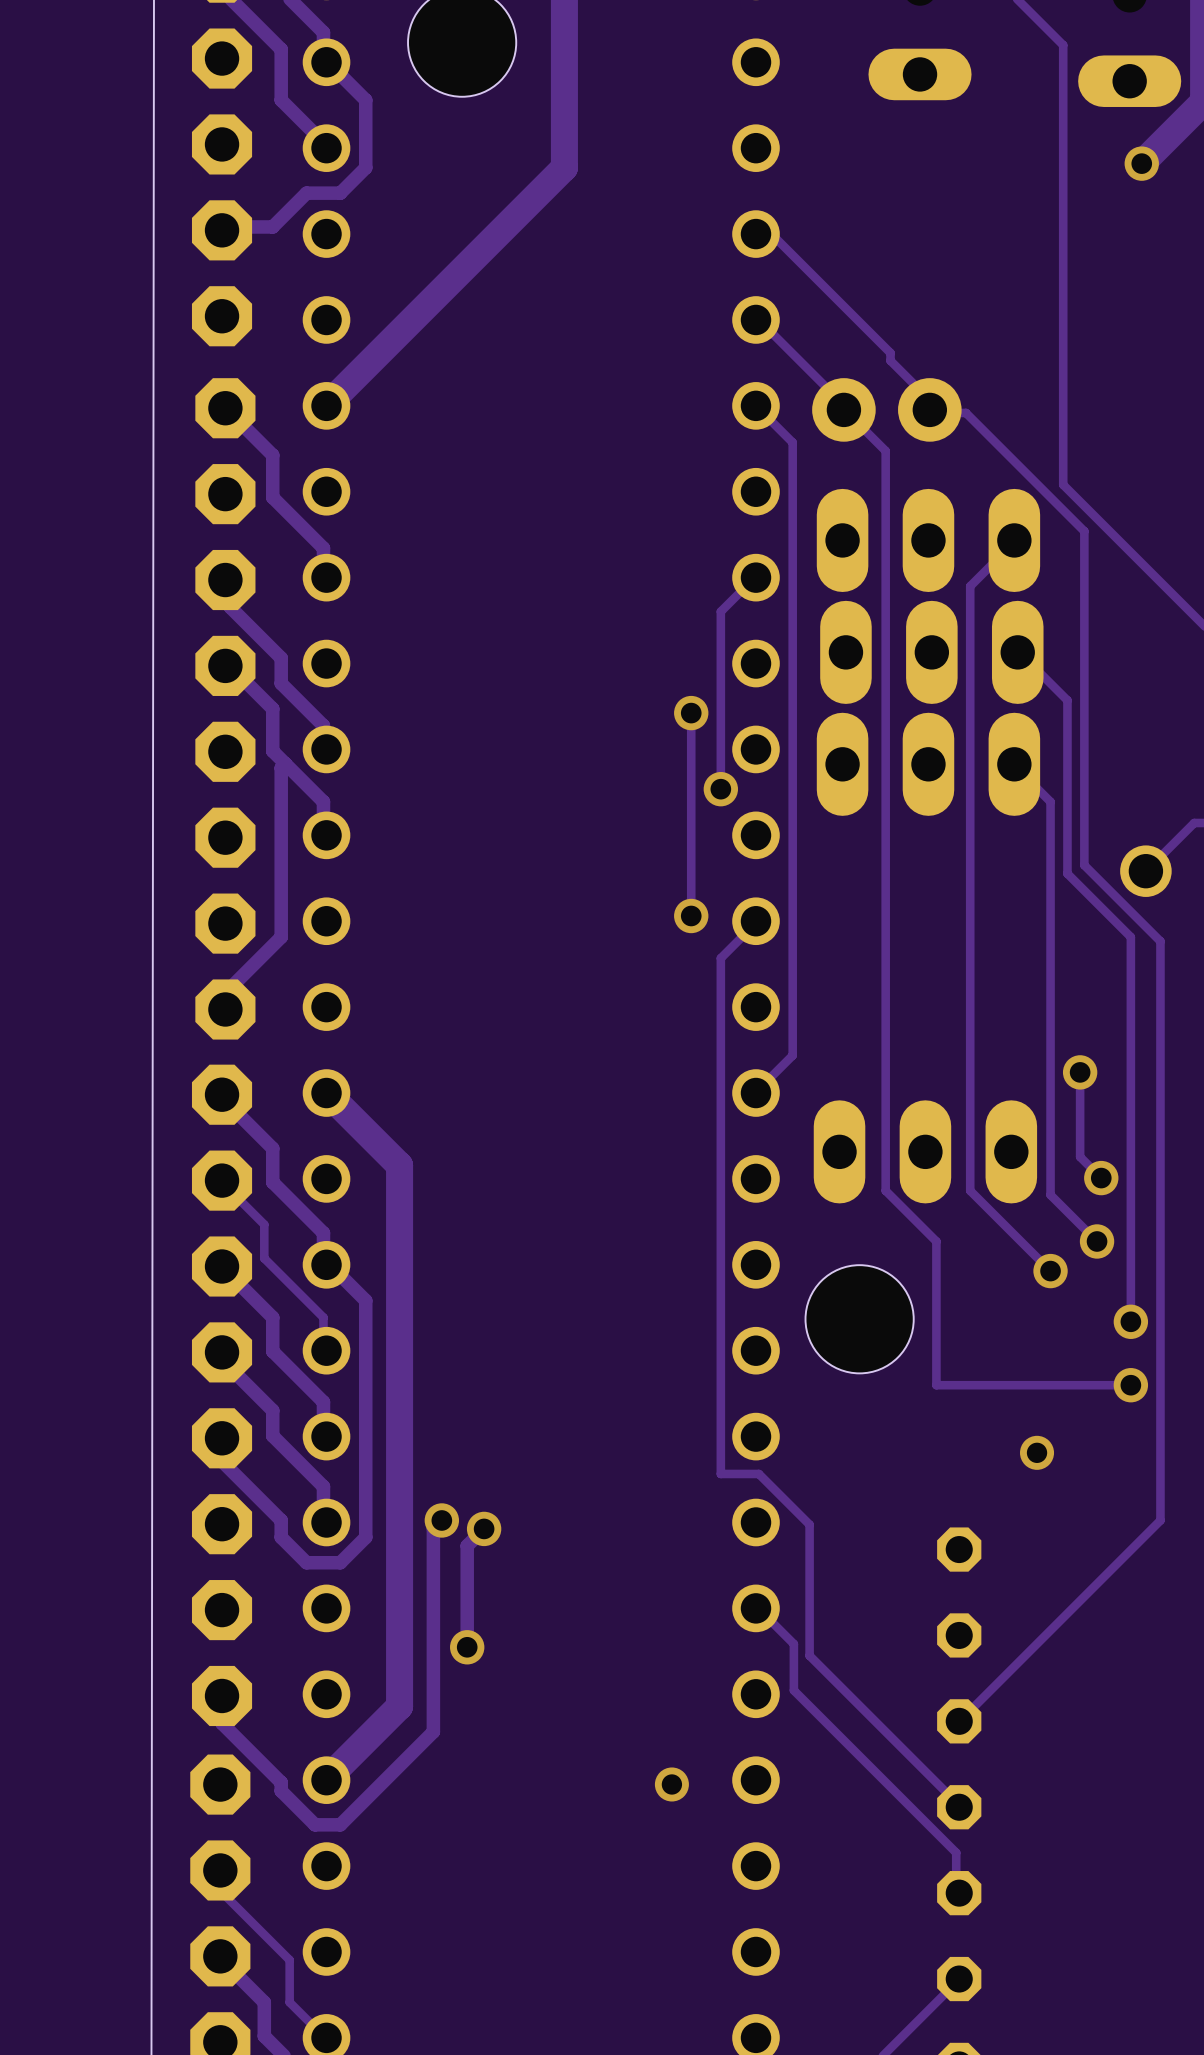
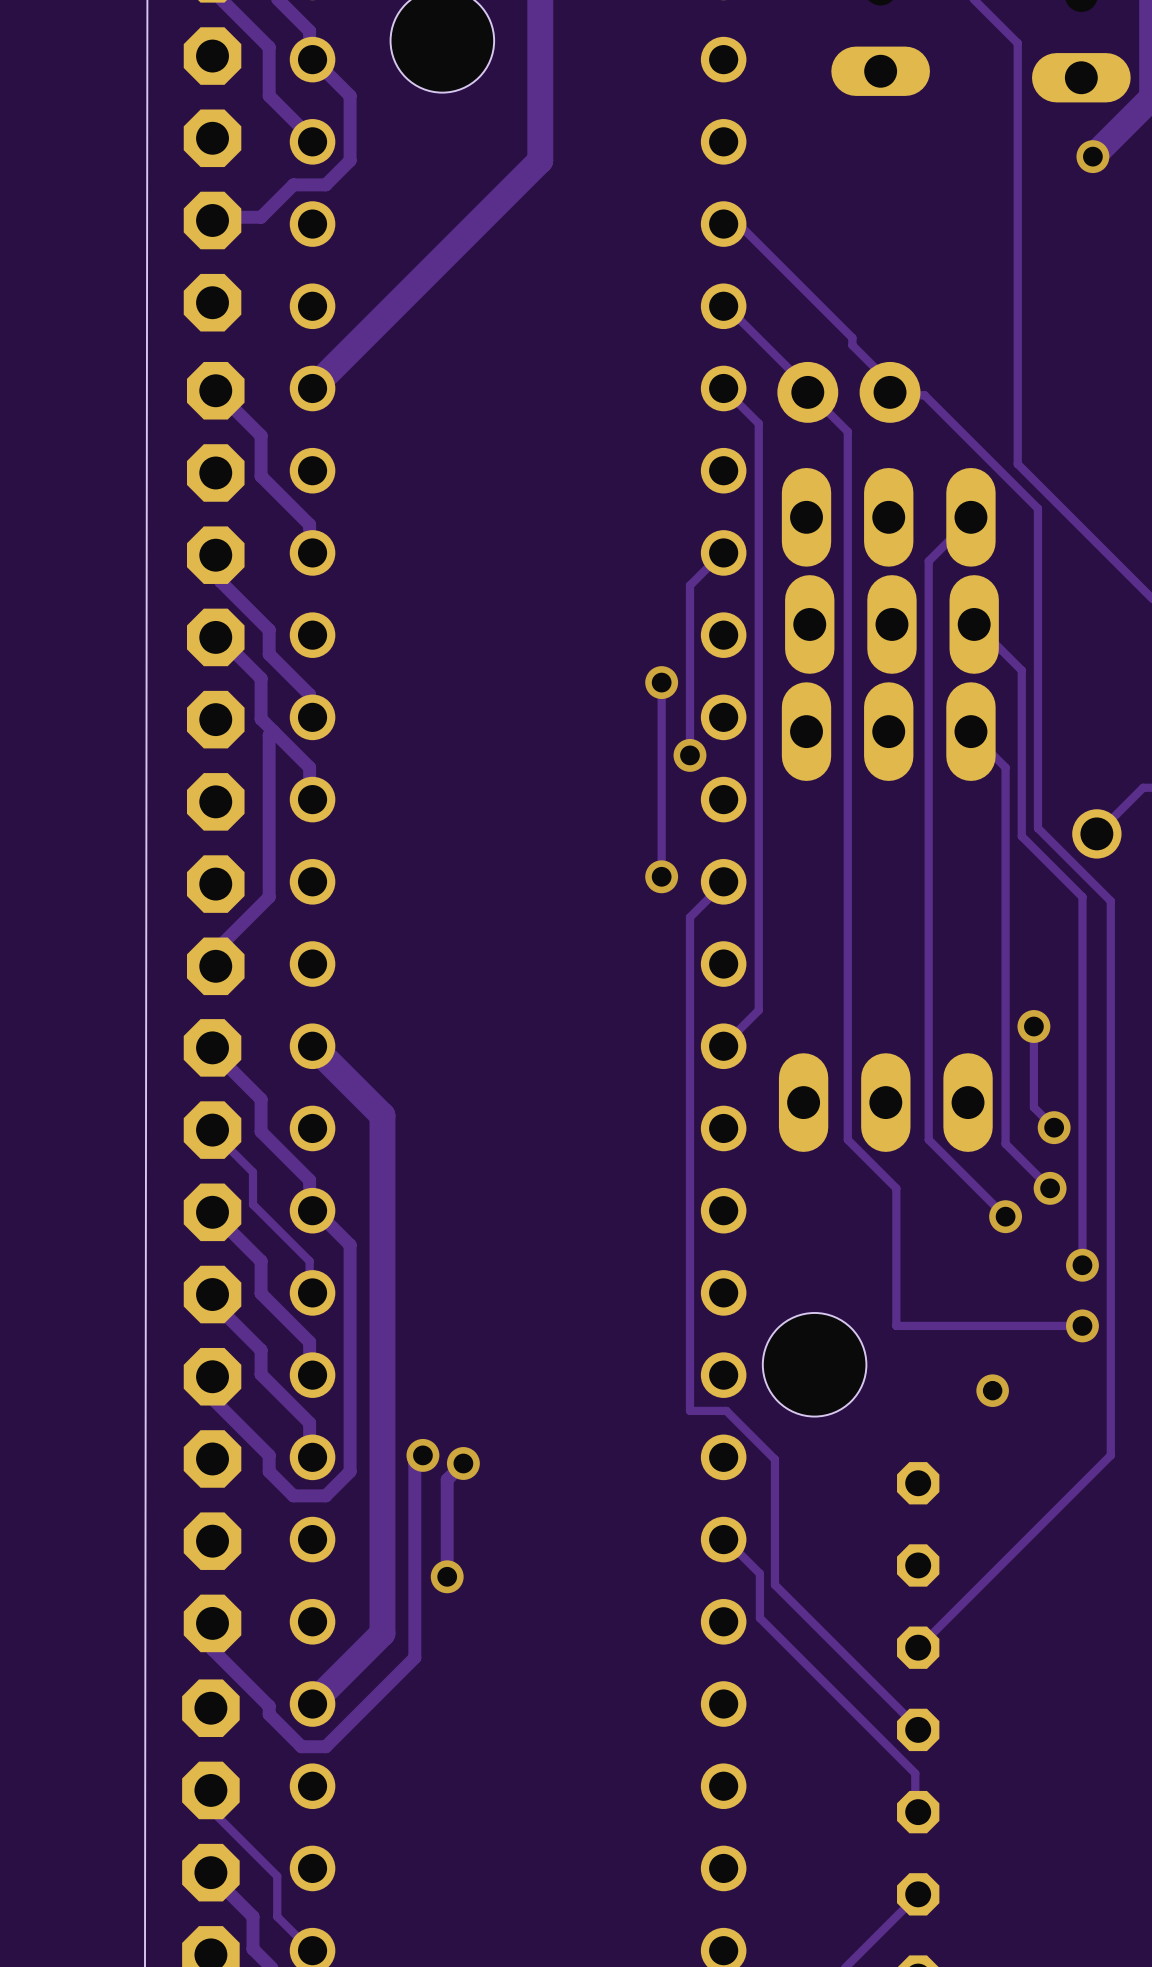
hole position: (859, 1319) -> (814, 1364)
via: (671, 1784) -> none

